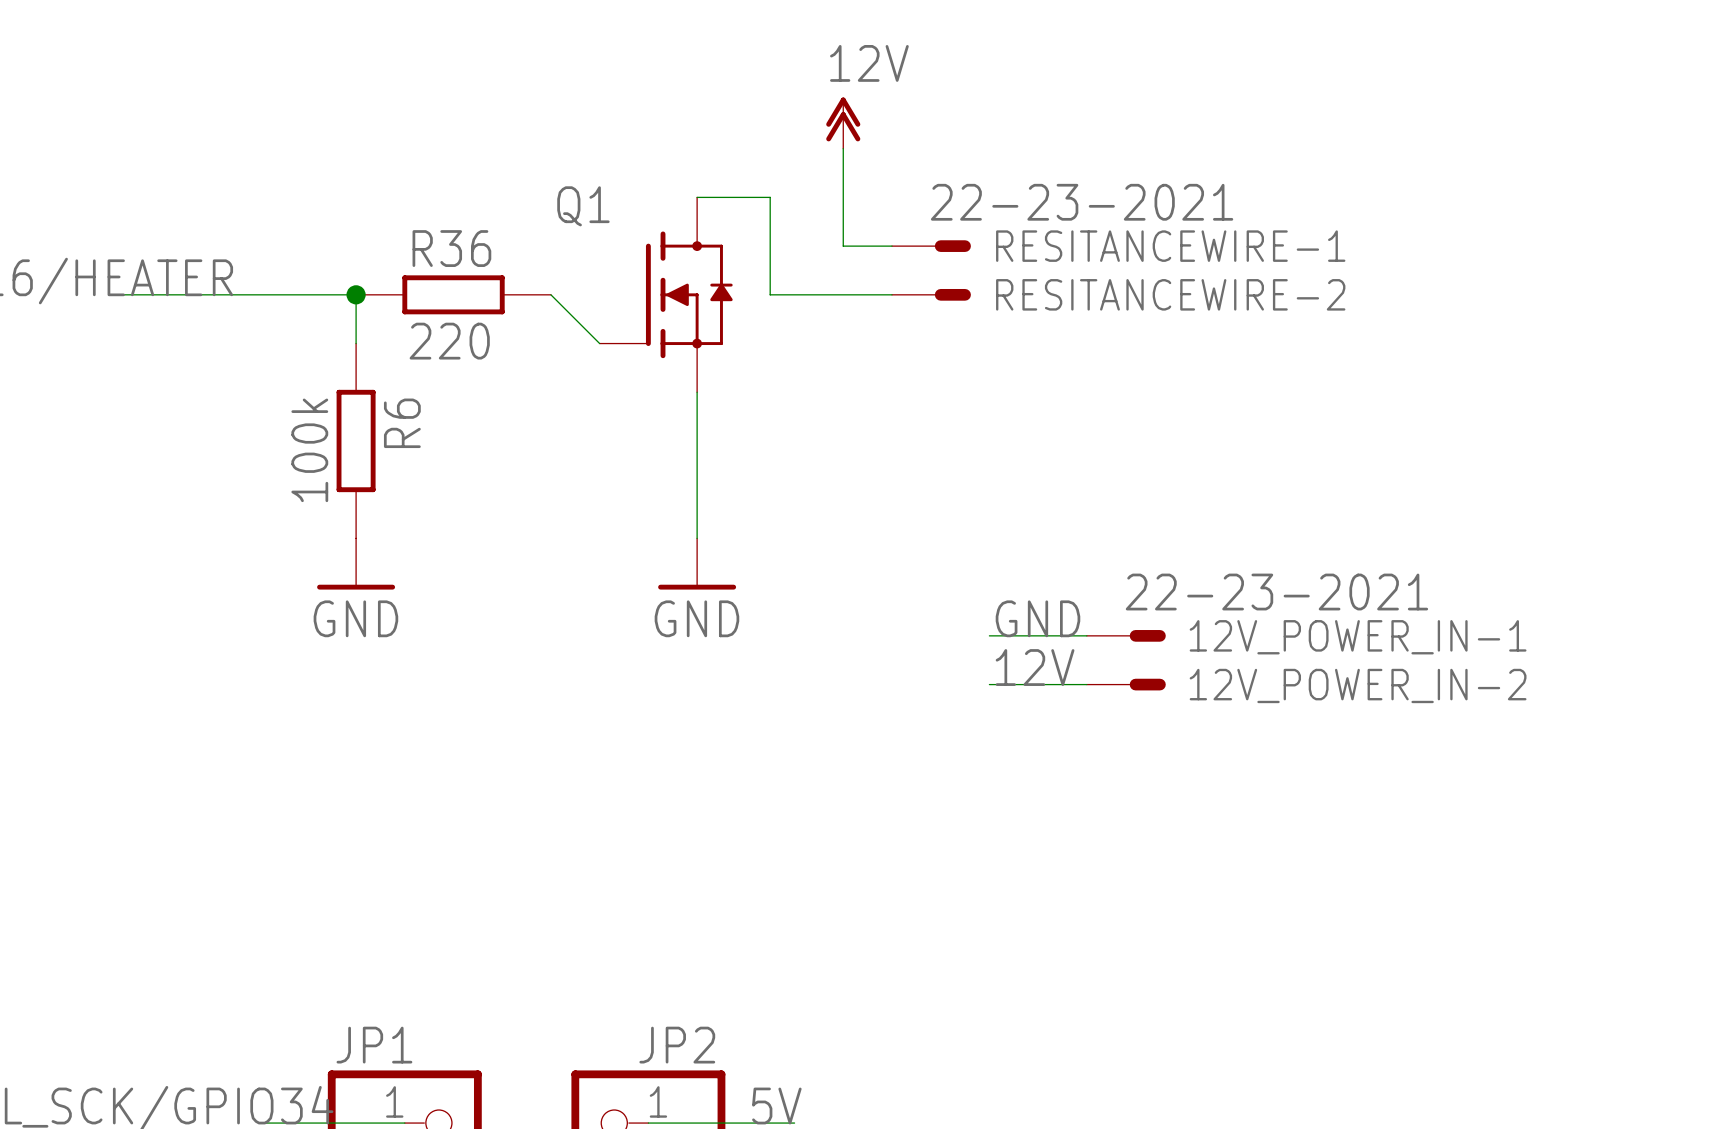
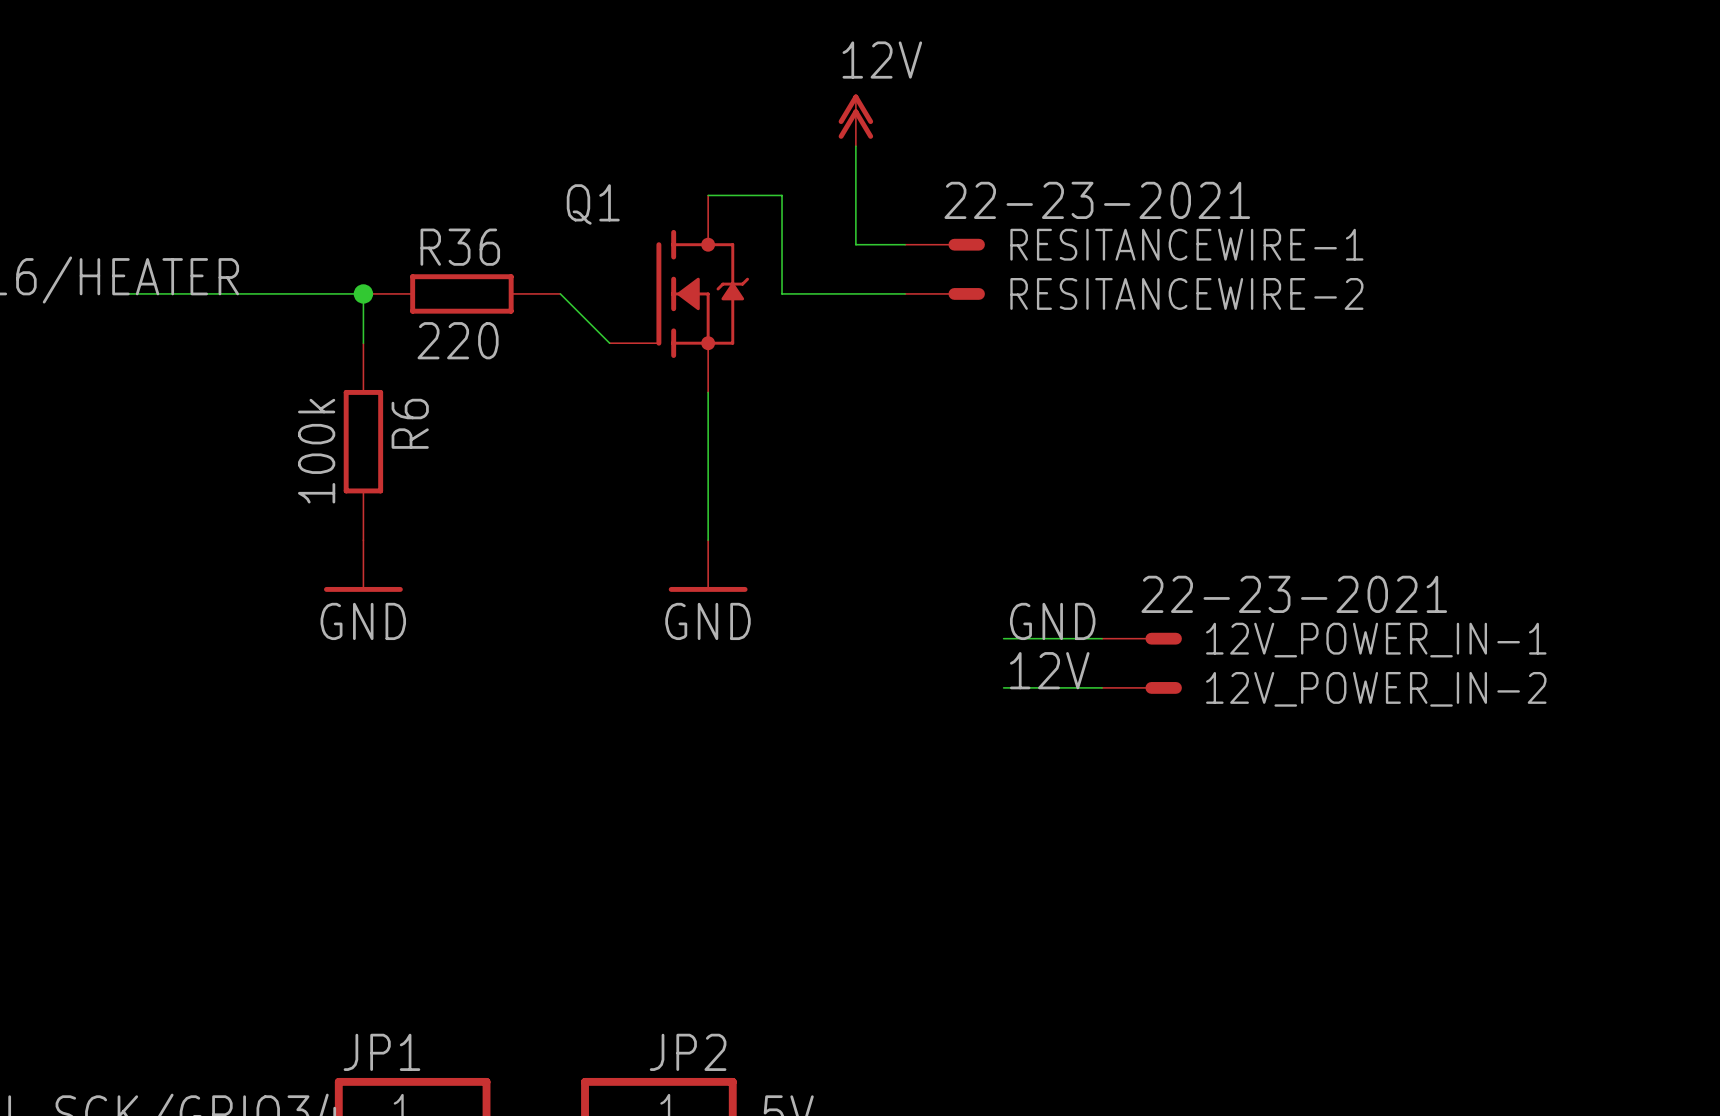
Q1 symbol: [599, 197, 733, 393] -> [609, 195, 750, 393]

